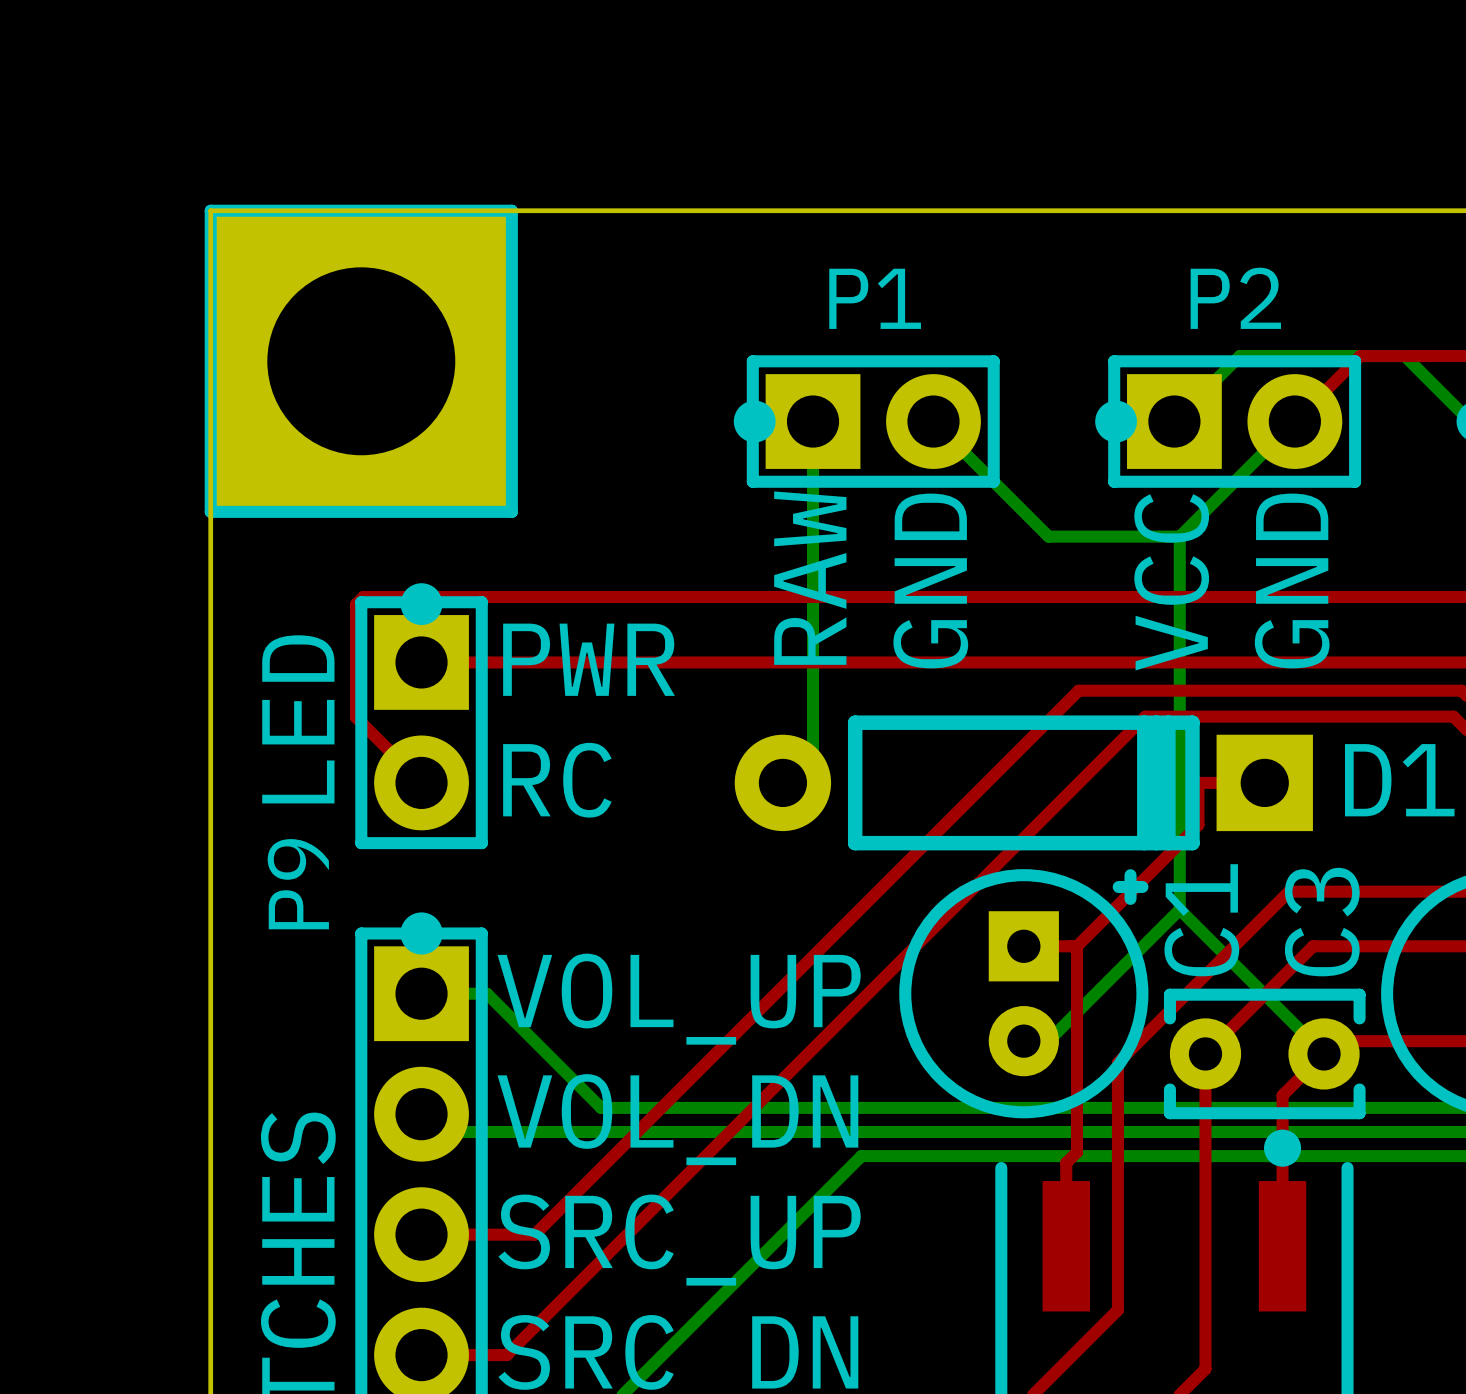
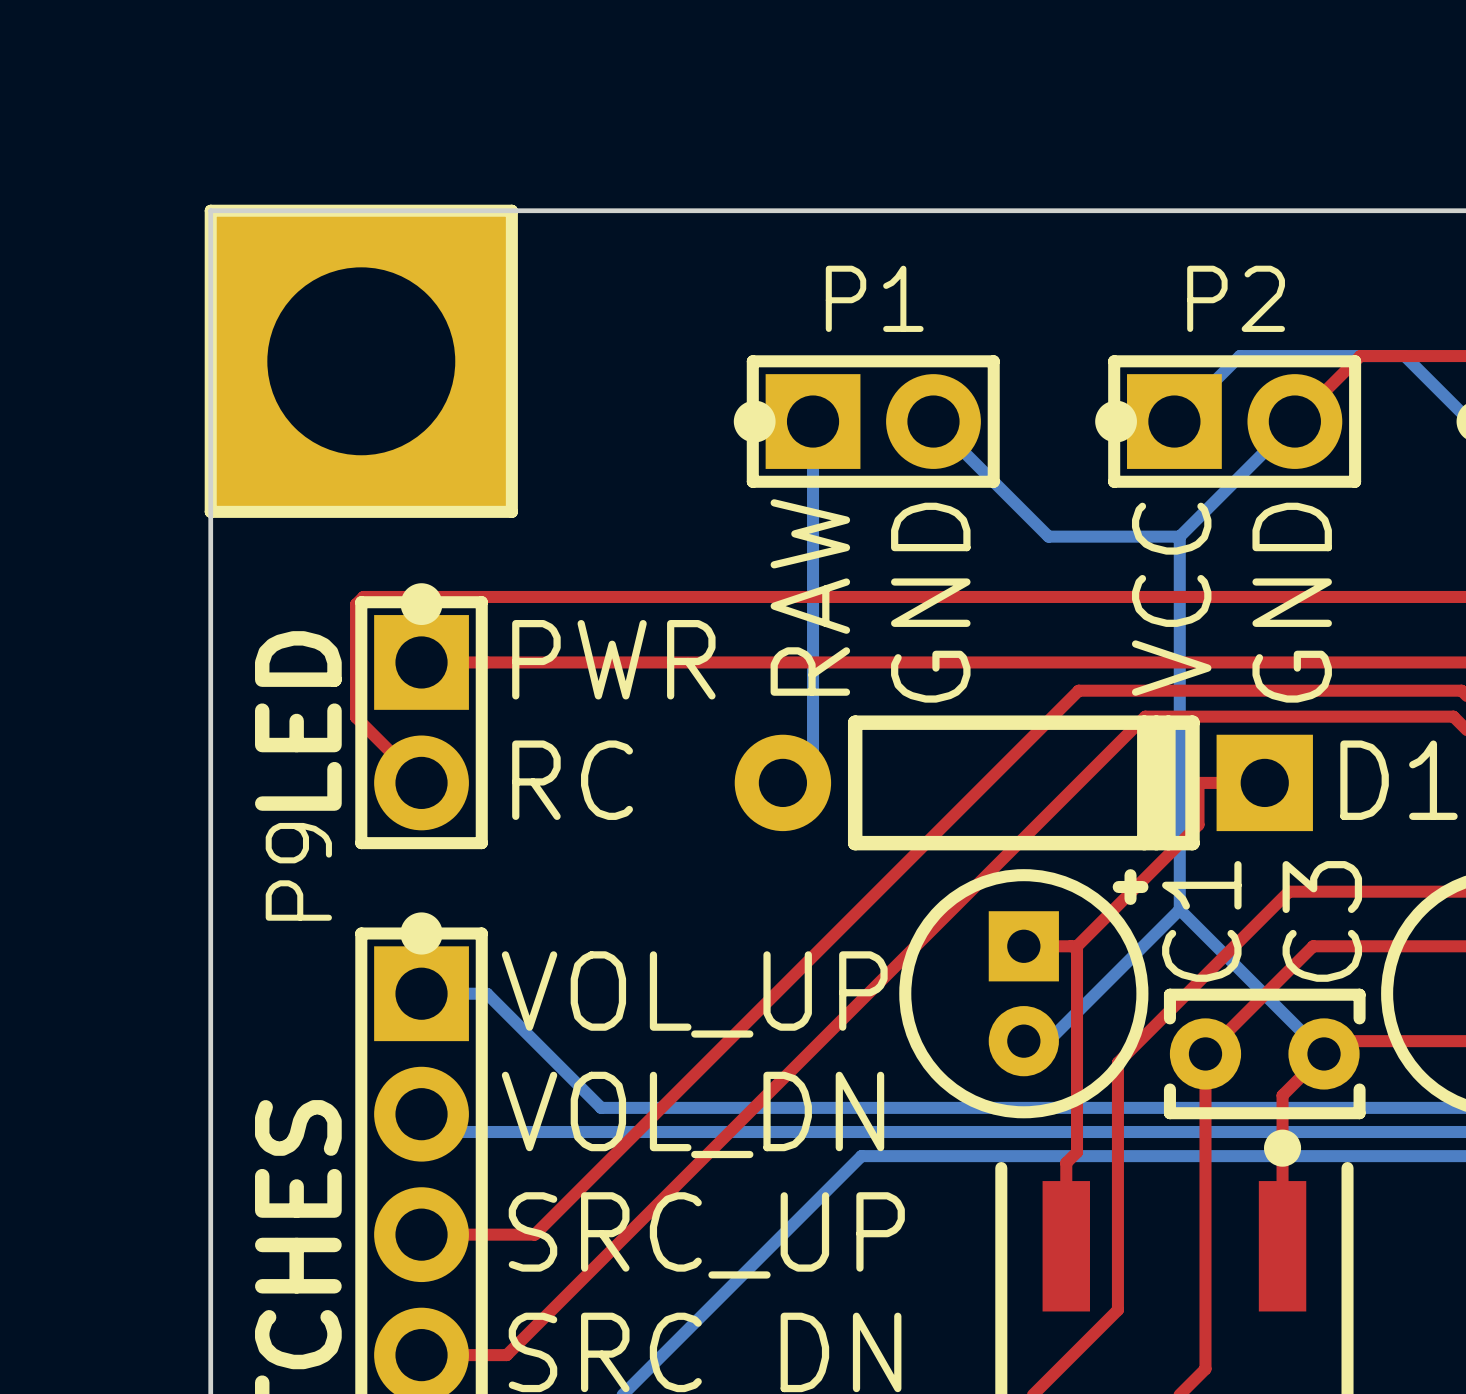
P9 name position: P9 (298, 884) -> P9 (298, 871)

